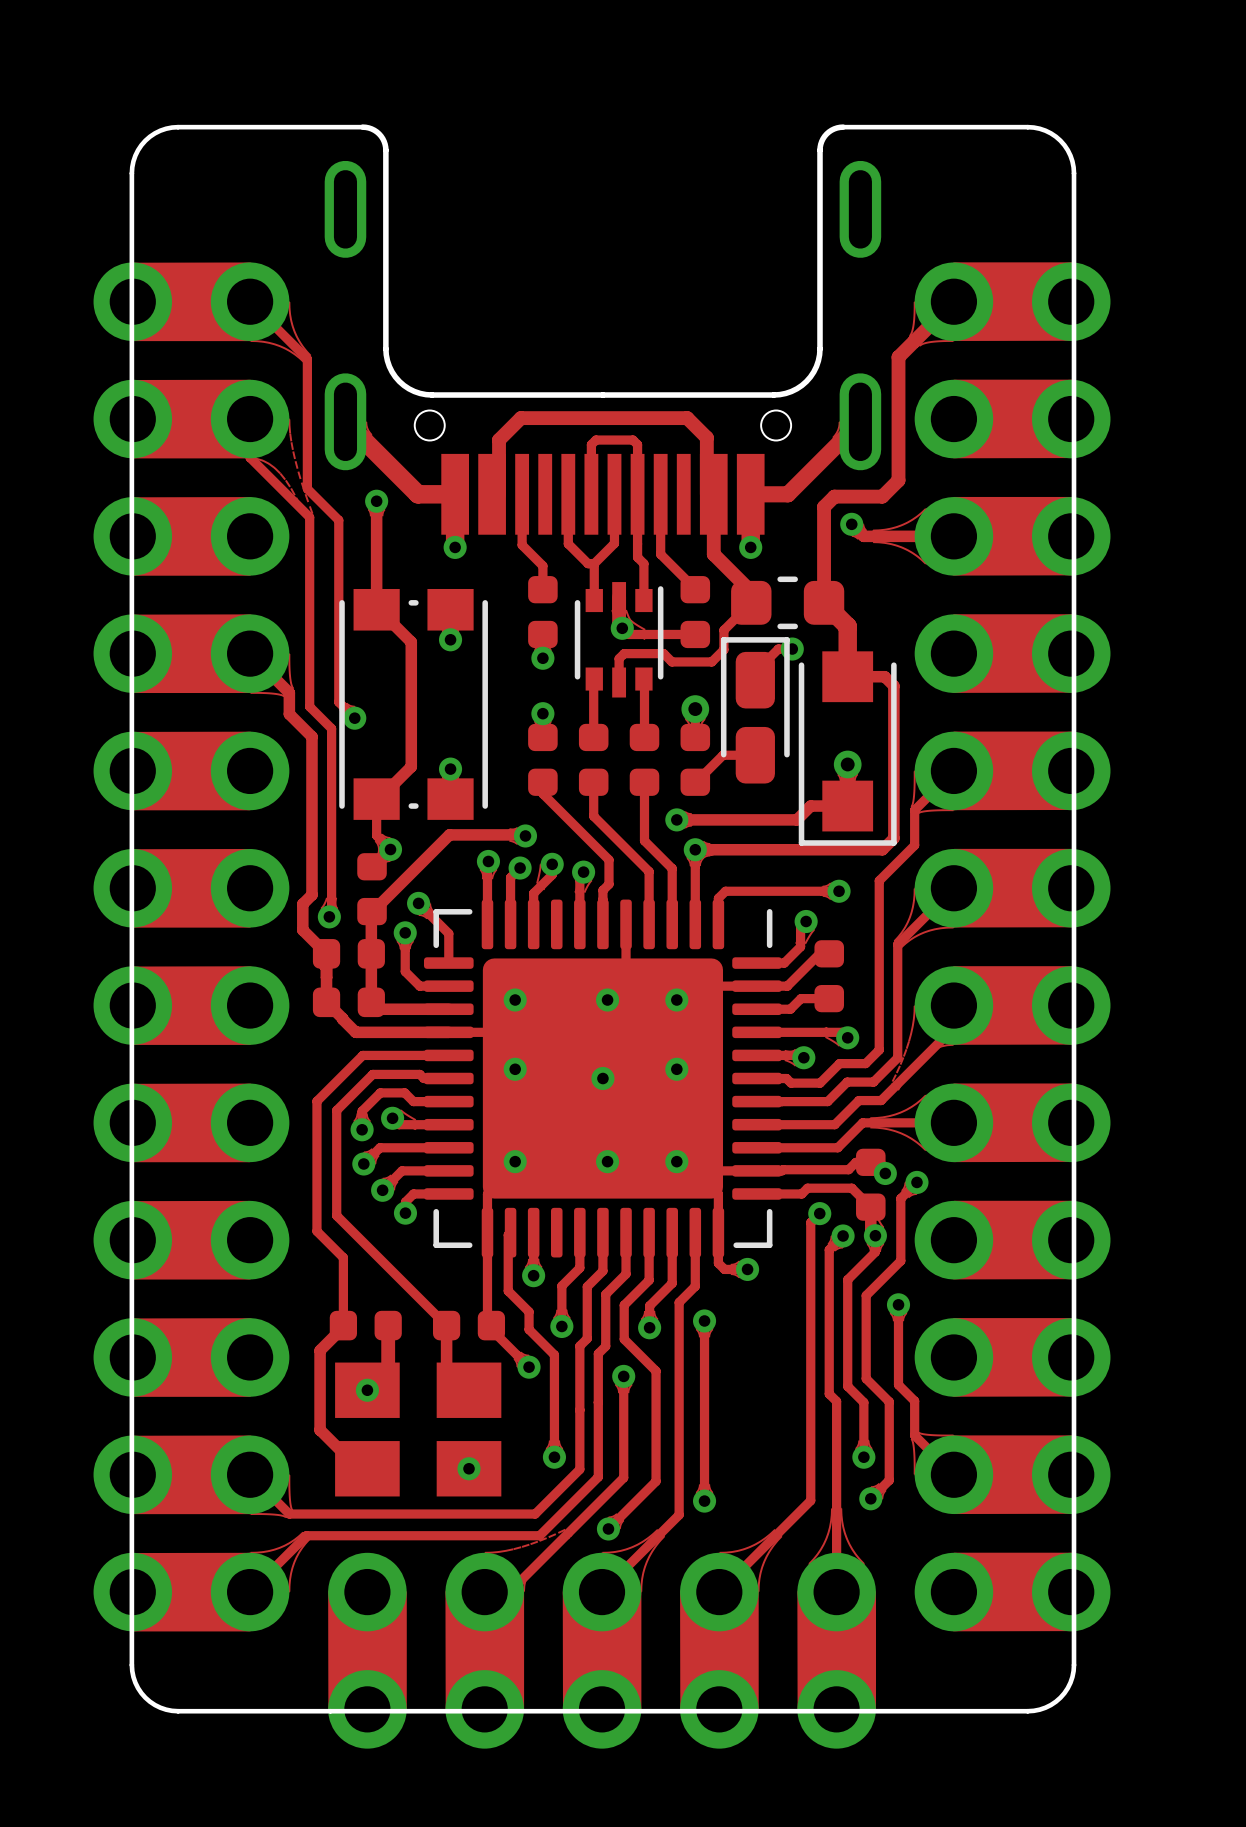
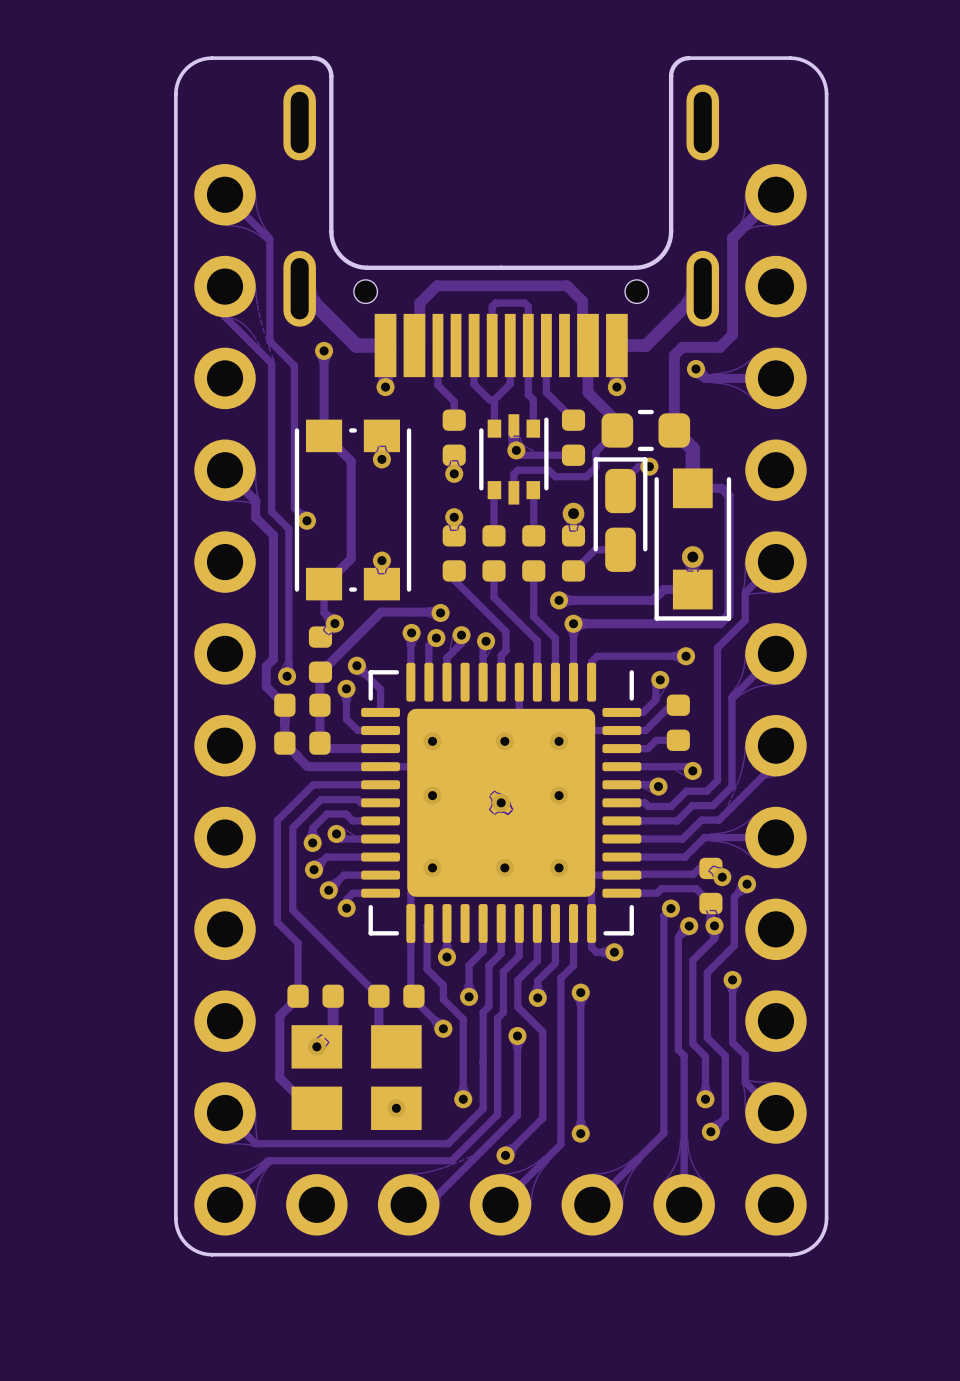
board edge: (233, 127) (178, 127) (160, 130) (149, 136) (141, 145) (133, 161) (131, 173) (131, 1665) (135, 1682) (145, 1697) (160, 1707) (178, 1711) (1027, 1711) (1039, 1709) (1050, 1705) (1060, 1697) (1067, 1688) (1072, 1676) (1074, 1665) (1074, 173) (1072, 161) (1064, 145) (1055, 136) (1045, 130) (1027, 127) (972, 127) -> (212, 58) (198, 60) (186, 68) (178, 80) (175, 94) (175, 1218) (178, 1232) (186, 1244) (198, 1251) (212, 1254) (790, 1254) (804, 1251) (812, 1247) (823, 1232) (826, 1218) (826, 94) (823, 80) (815, 68) (804, 60) (790, 58)
part: (191, 946) -> none
part: none -> (225, 699)
part: none -> (775, 699)
part: (1012, 946) -> none
part: none -> (500, 1204)
part: (602, 1650) -> none

